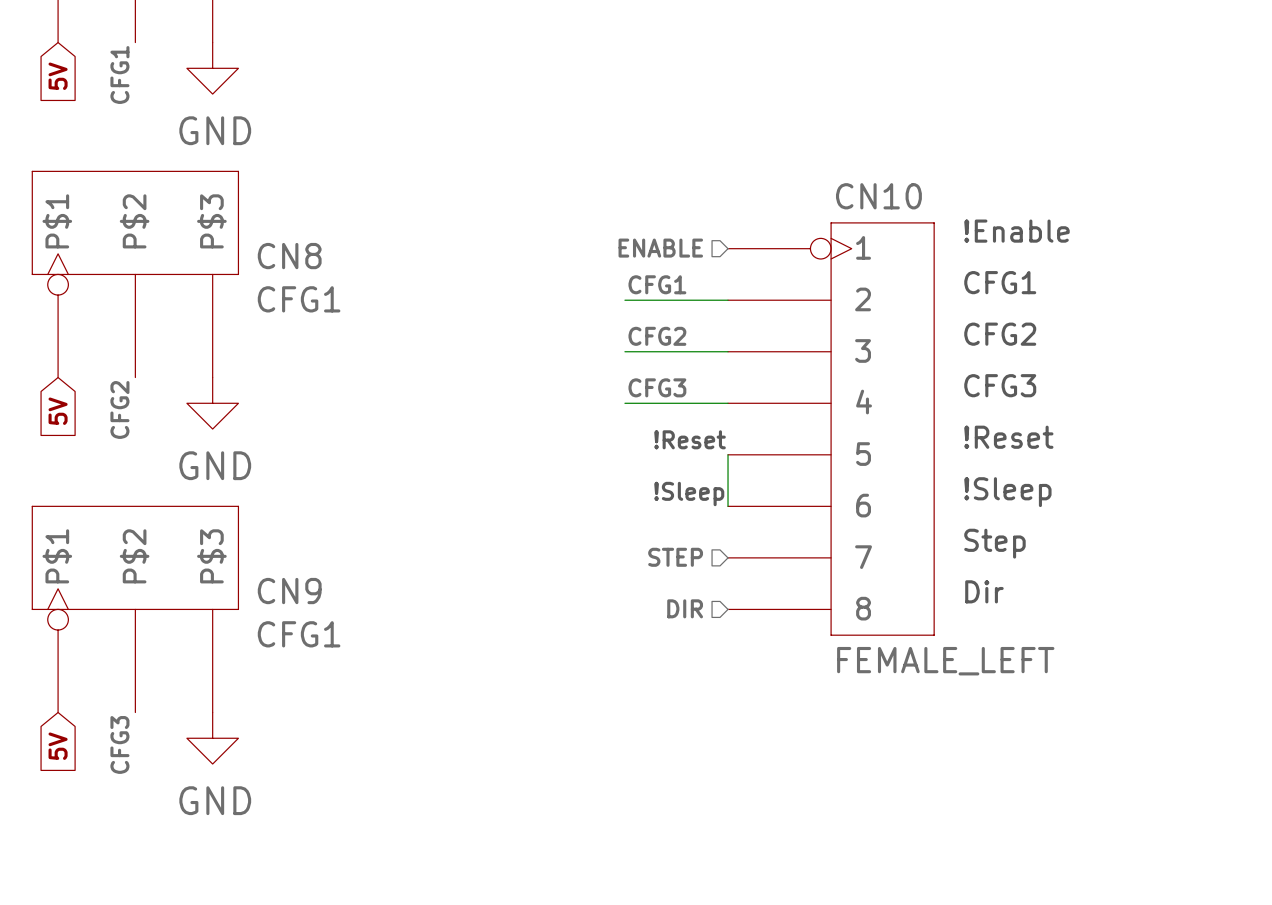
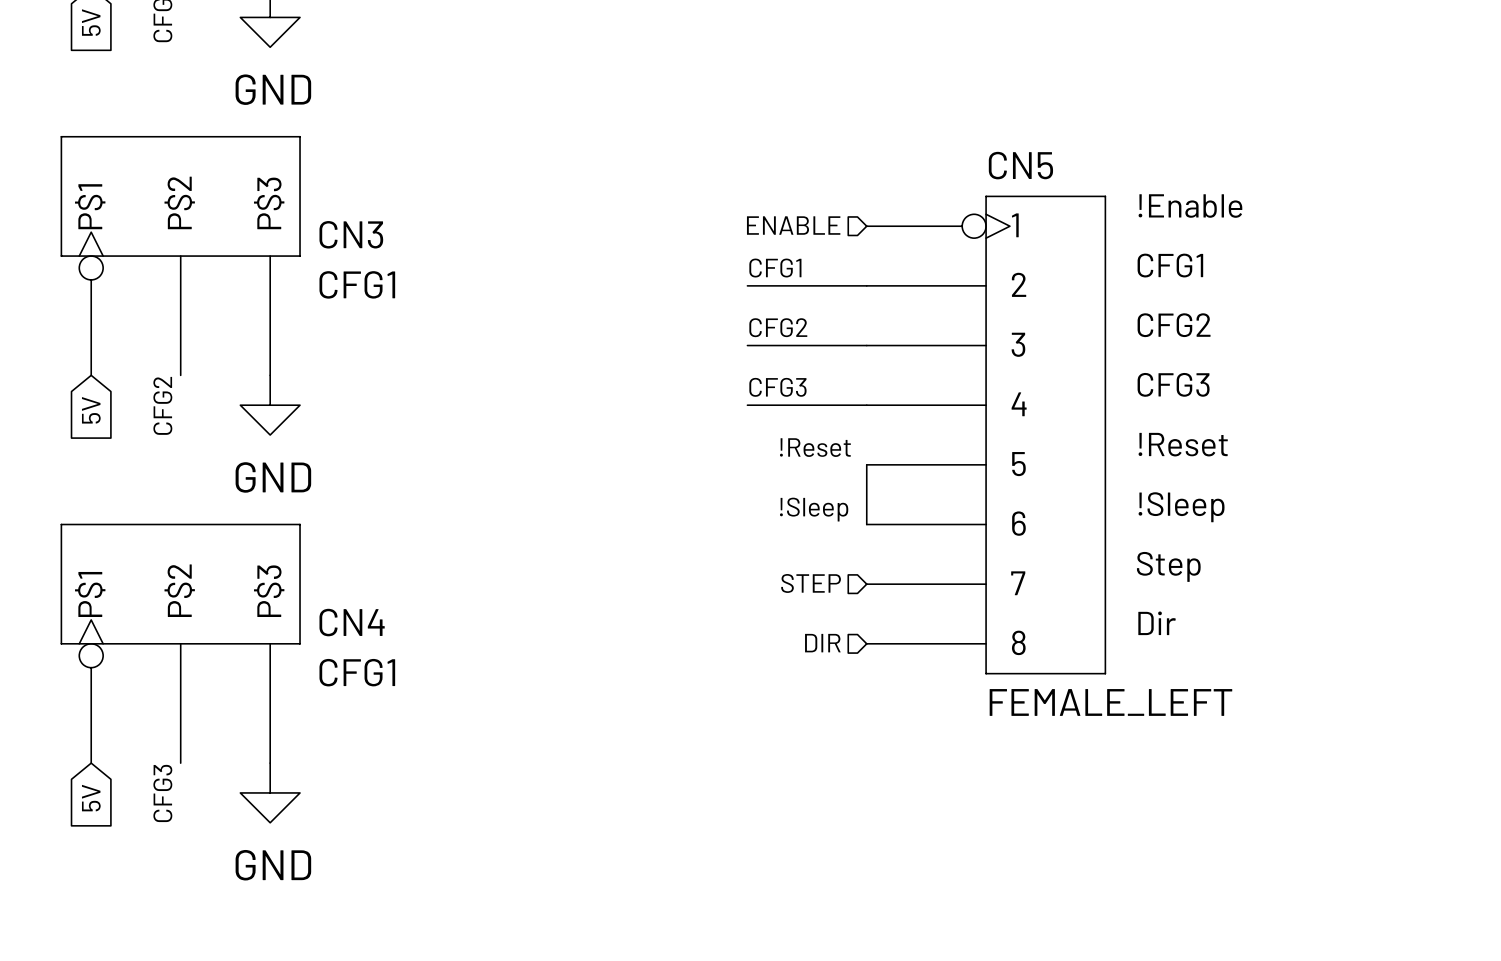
CN10 name: CN10 (878, 196) -> CN5 (1020, 165)
CN8 name: CN8 (289, 256) -> CN3 (351, 234)
CN9 name: CN9 (289, 591) -> CN4 (352, 622)

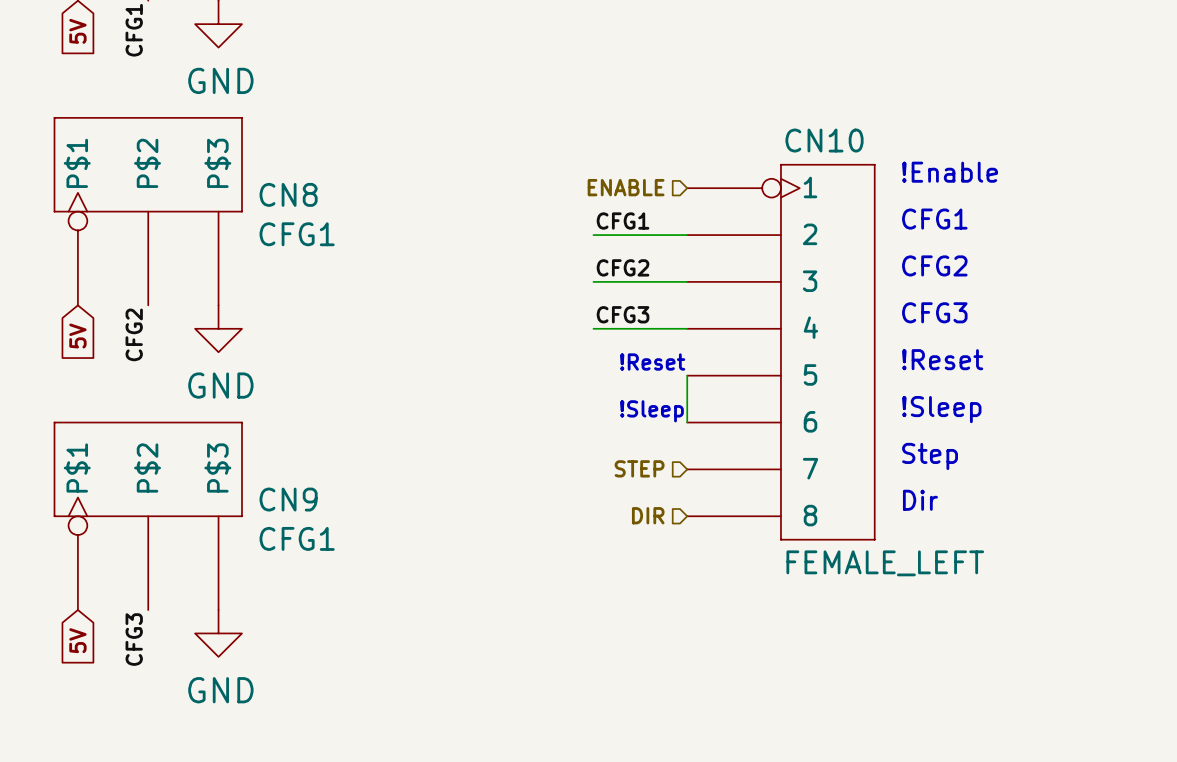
CN5 name: CN5 (1020, 165) -> CN10 (824, 140)
CN3 name: CN3 (351, 234) -> CN8 (288, 194)
CN4 name: CN4 (352, 622) -> CN9 (288, 499)

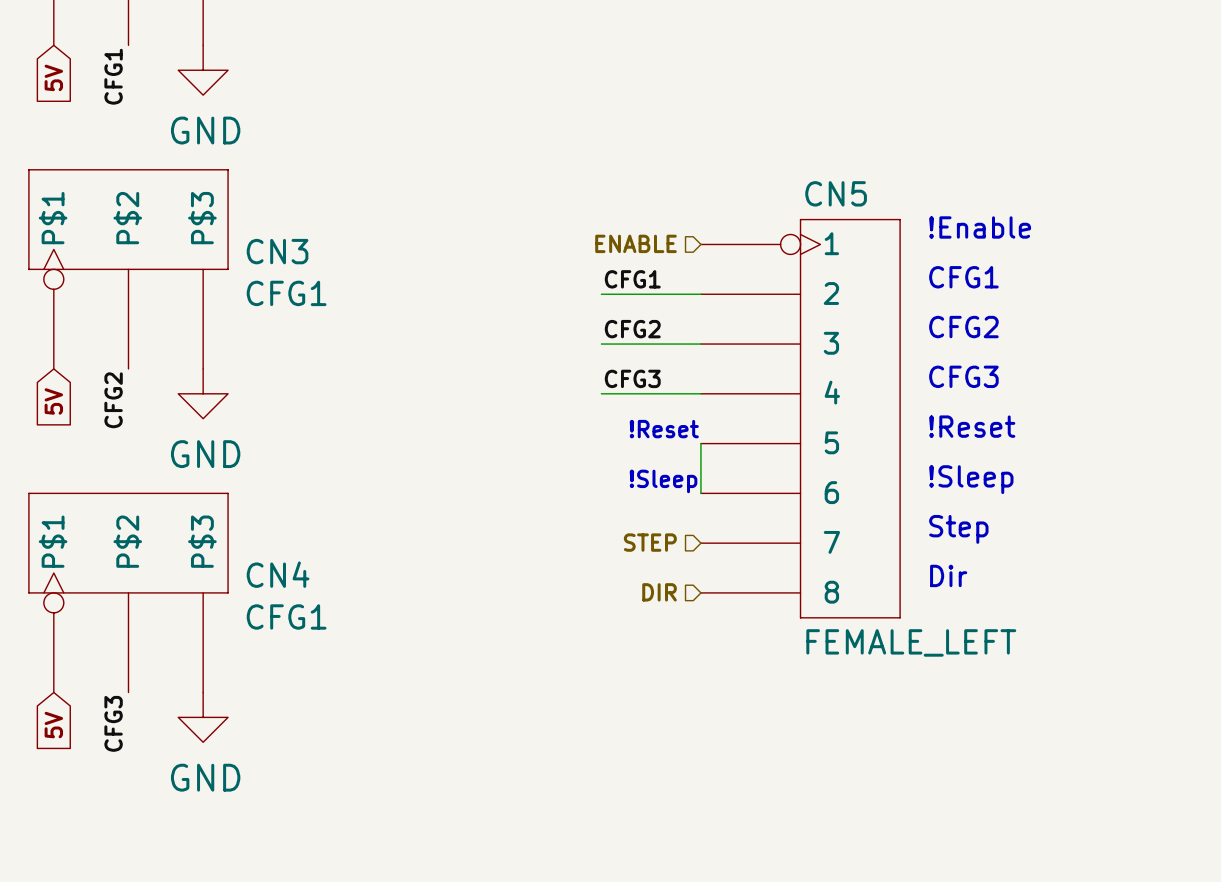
CN10 name: CN10 (824, 140) -> CN5 (836, 193)
CN8 name: CN8 (288, 194) -> CN3 (277, 251)
CN9 name: CN9 (288, 499) -> CN4 (278, 574)

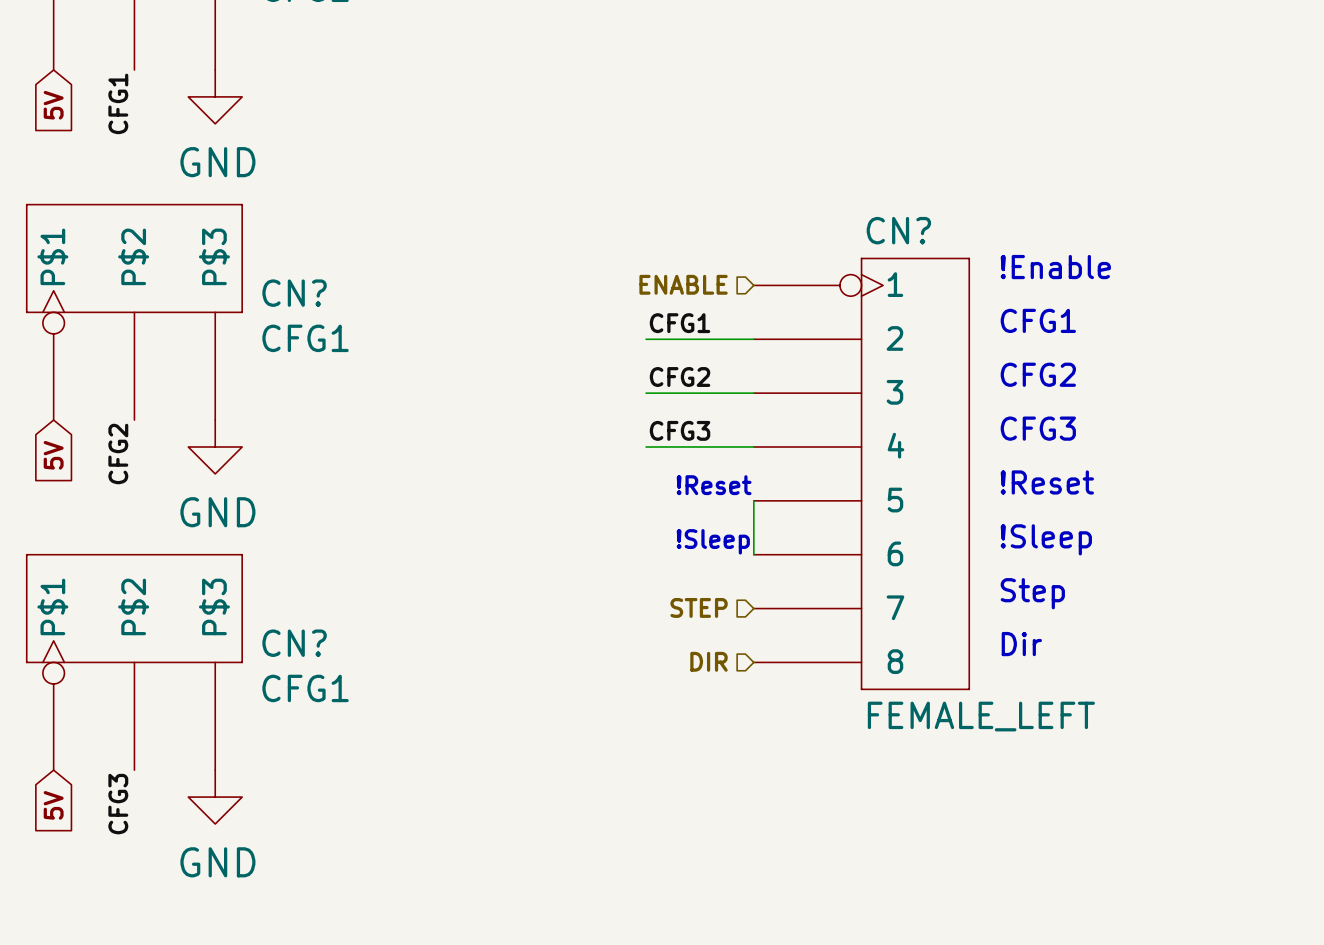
CN5 name: CN5 (836, 193) -> CN? (898, 230)
CN3 name: CN3 (277, 251) -> CN? (294, 293)
CN4 name: CN4 (278, 574) -> CN? (294, 643)

